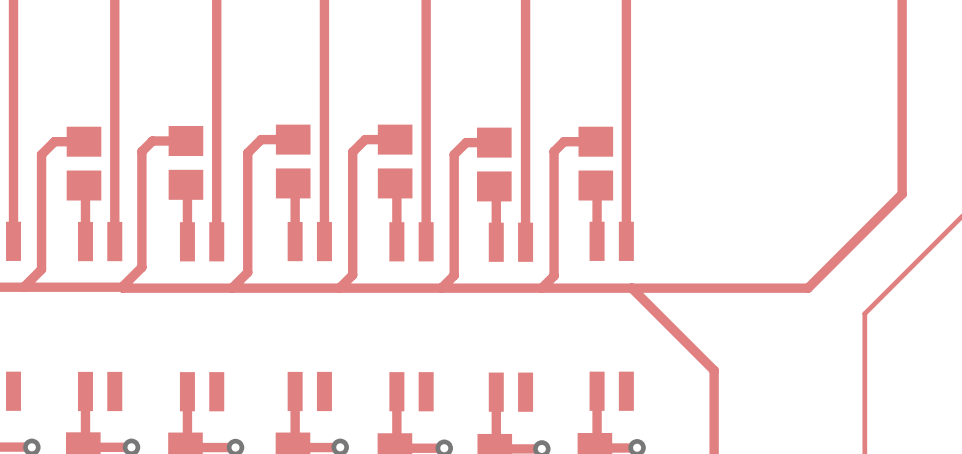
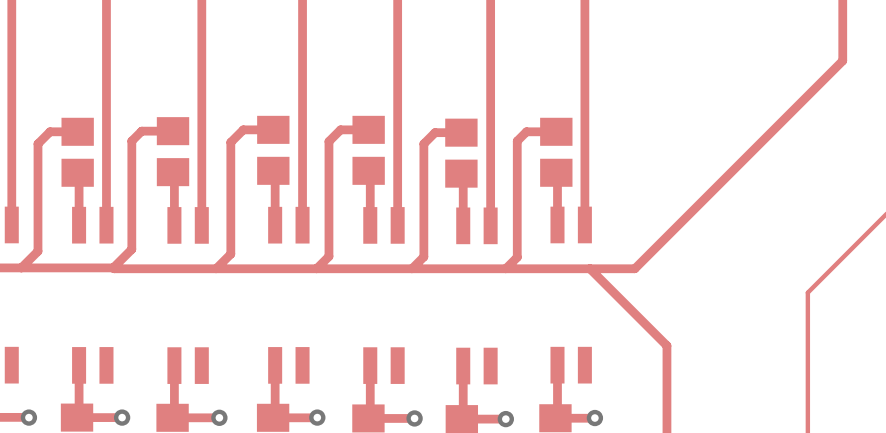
top track: (902, 65) (902, 194) (808, 288) (679, 288) -> (842, 60) (634, 268)

